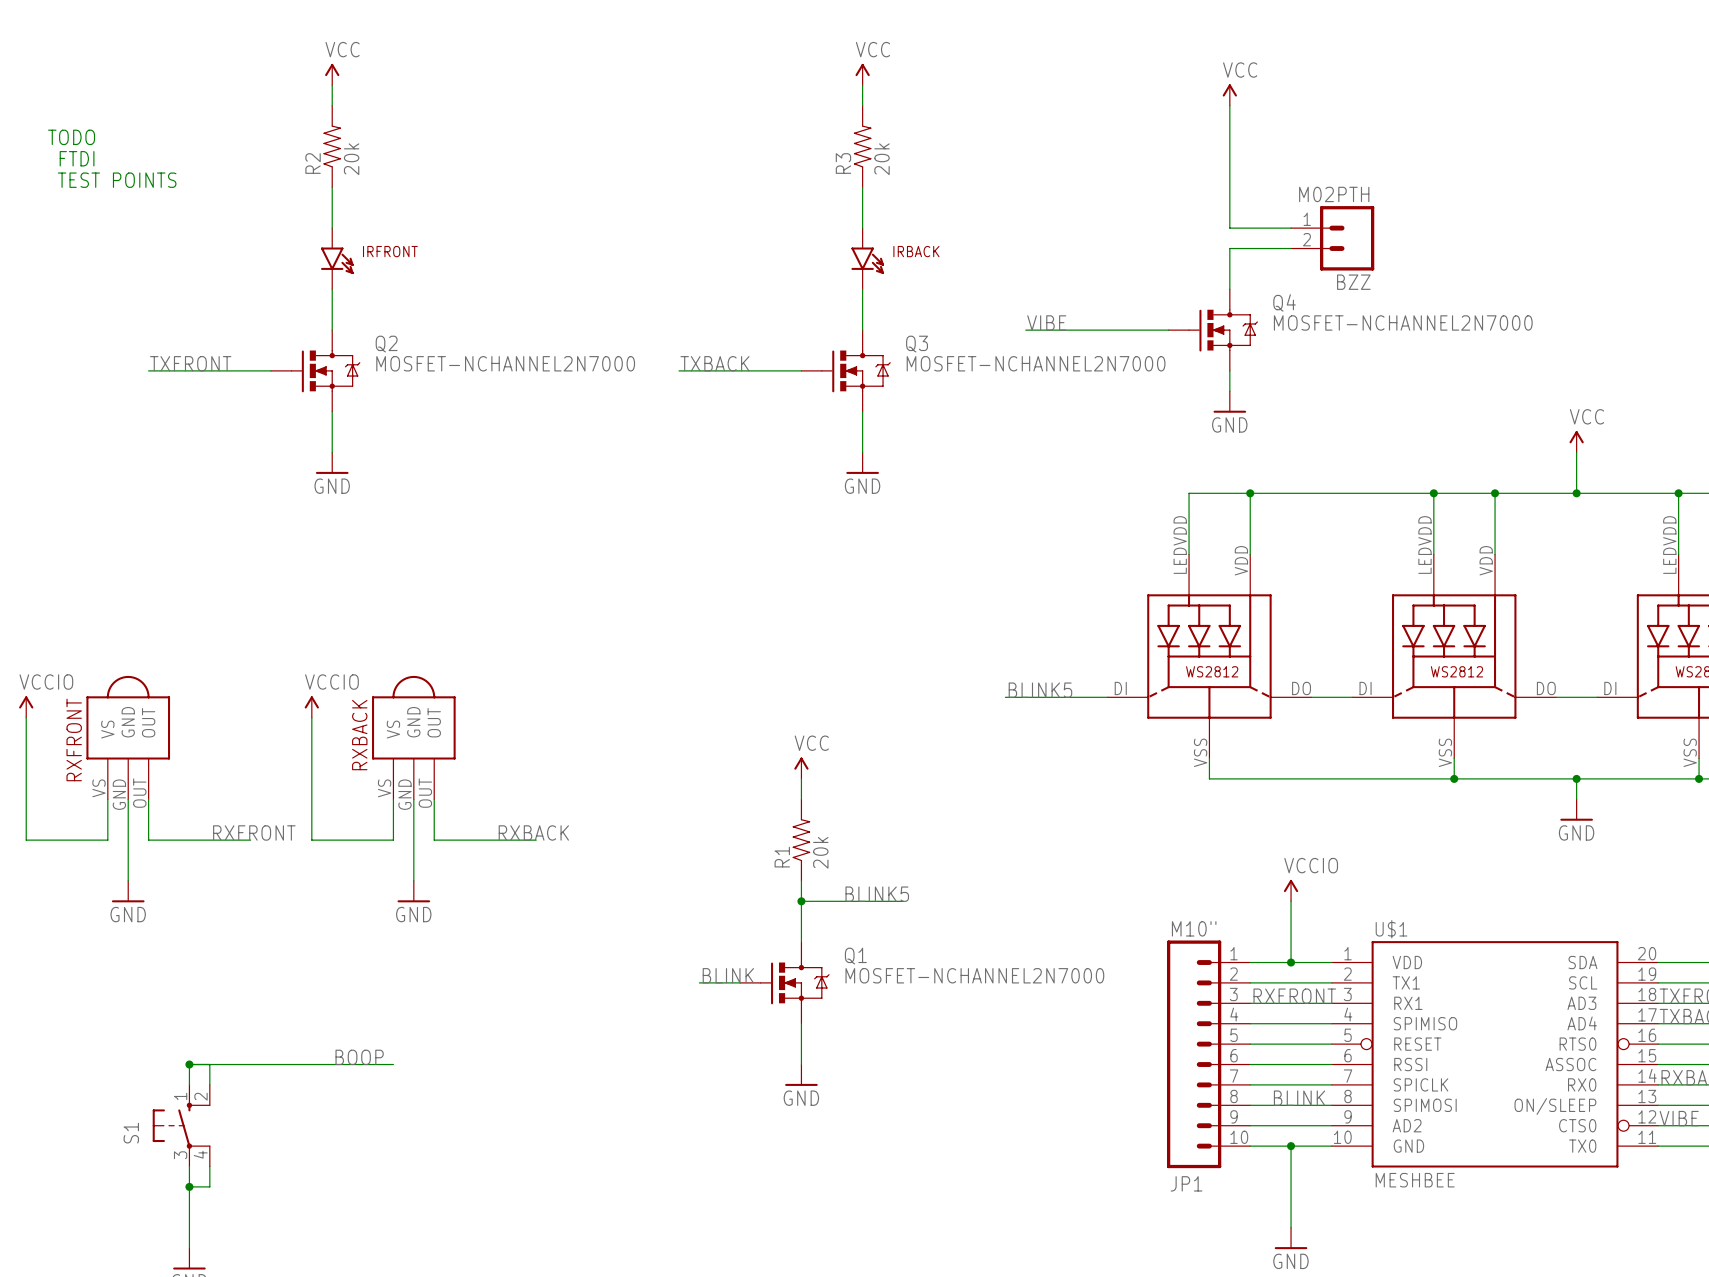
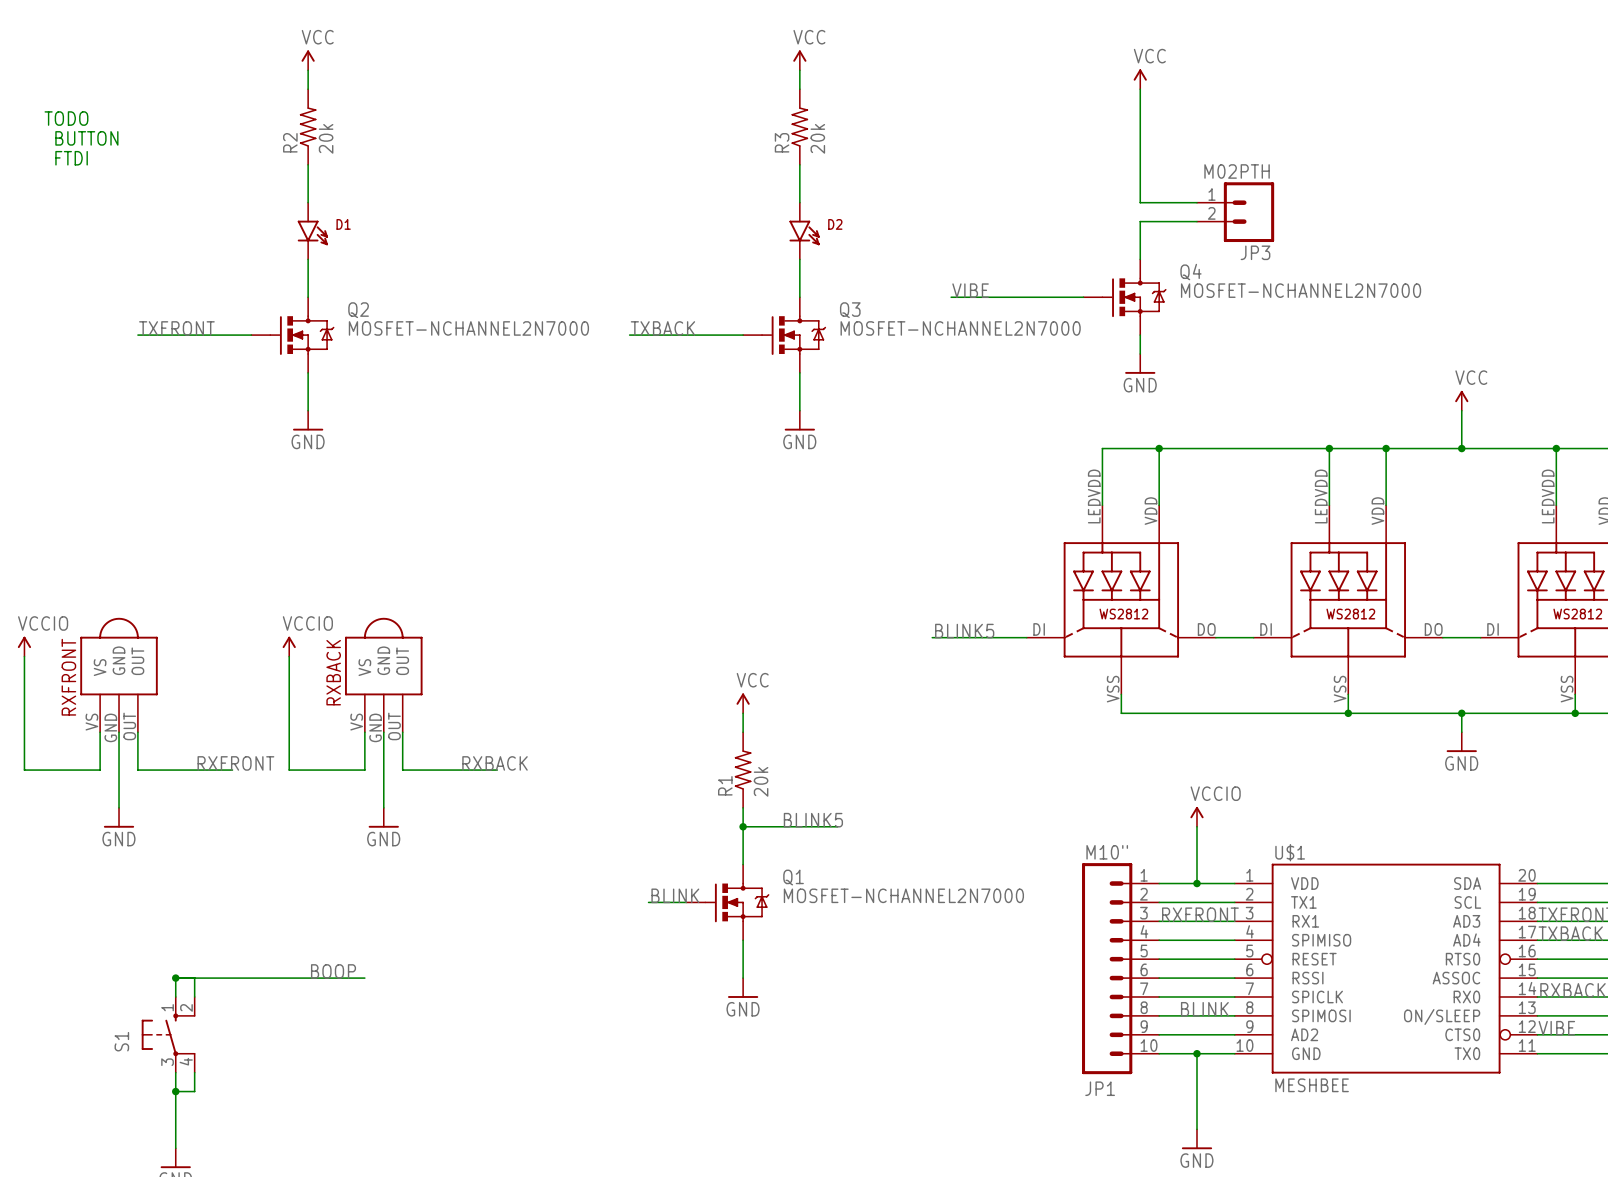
text: FTDI (77, 158) -> BUTTON (86, 138)
text: TEST POINTS (117, 180) -> FTDI (71, 158)
IRFRONT name: IRFRONT (390, 251) -> D1 (343, 224)
IRBACK name: IRBACK (916, 251) -> D2 (835, 224)
BZZ name: BZZ (1353, 282) -> JP3 (1255, 252)

